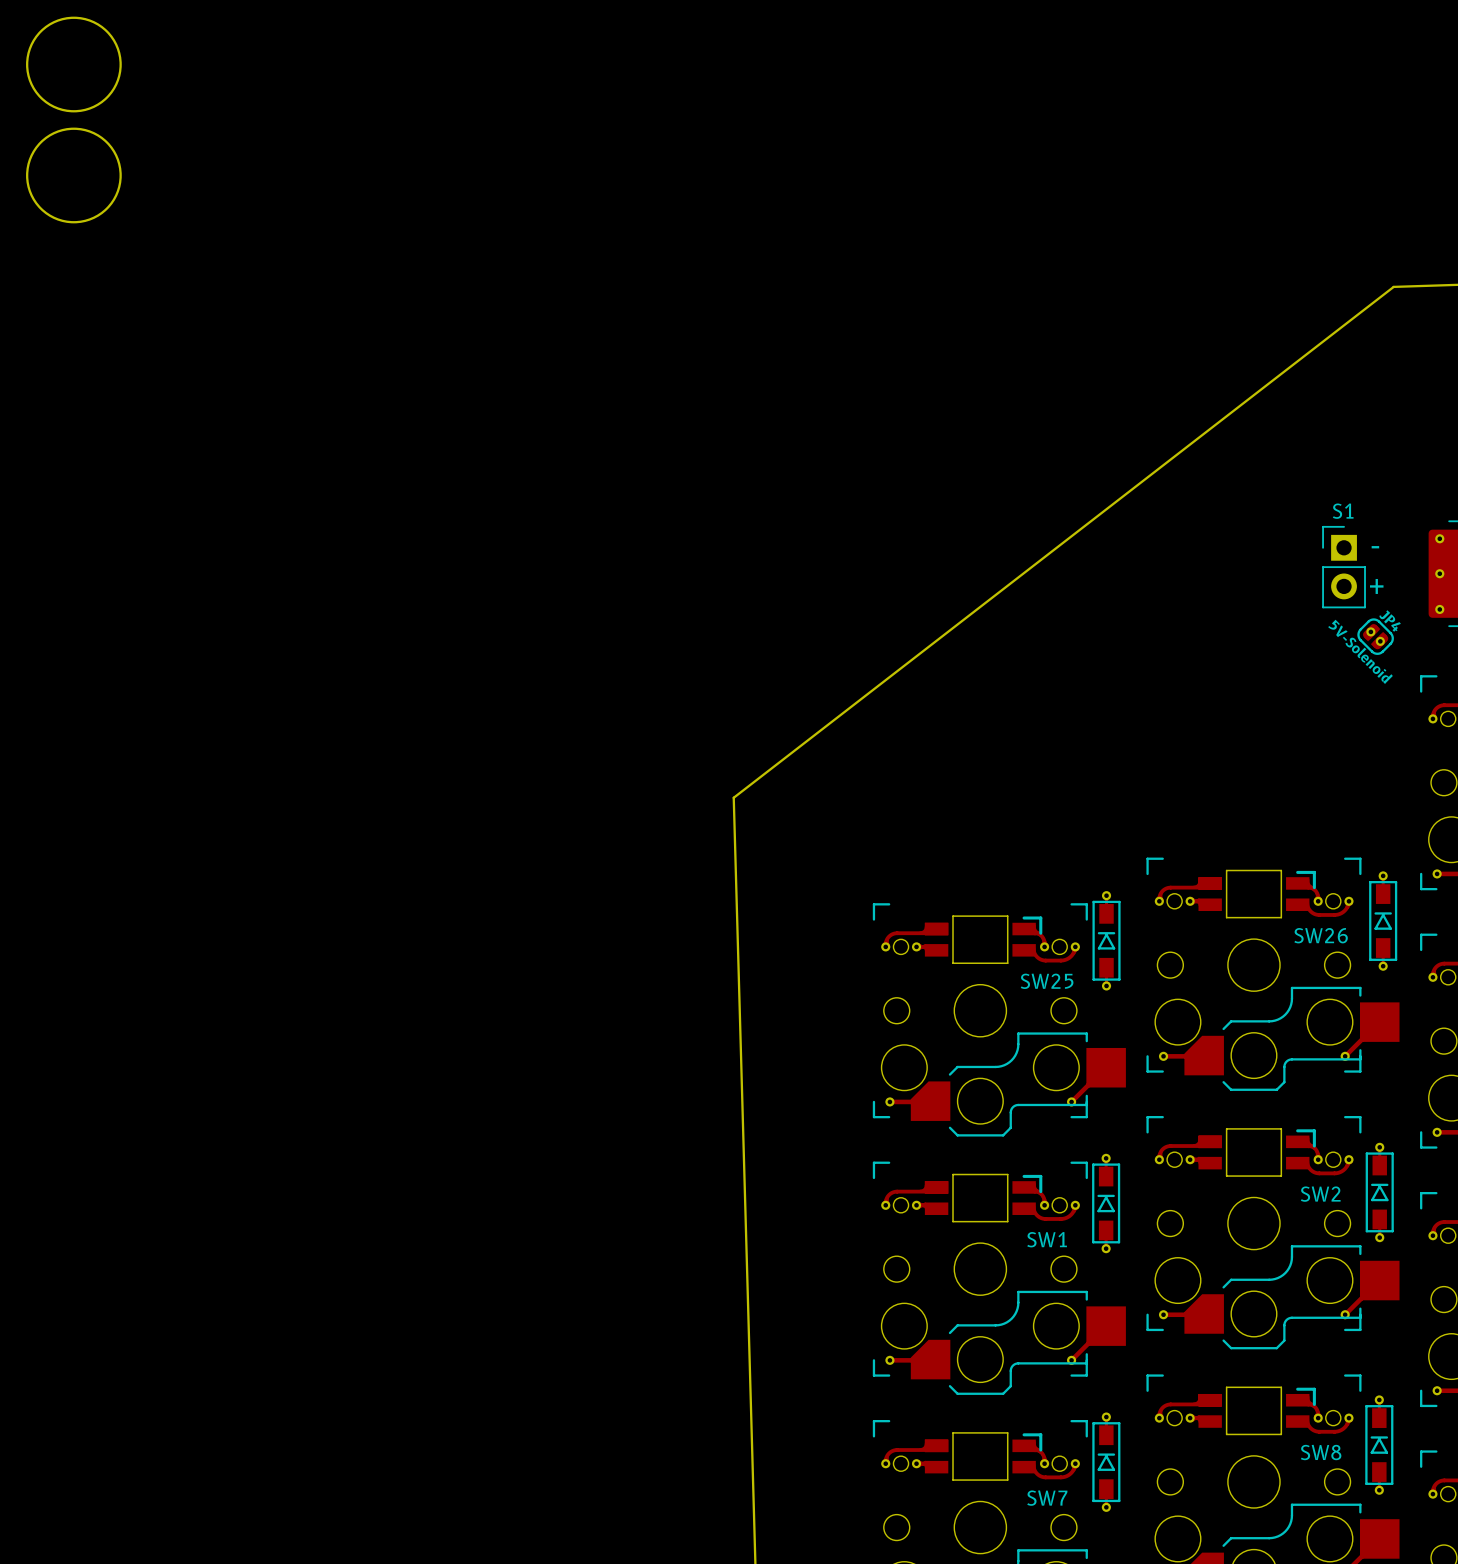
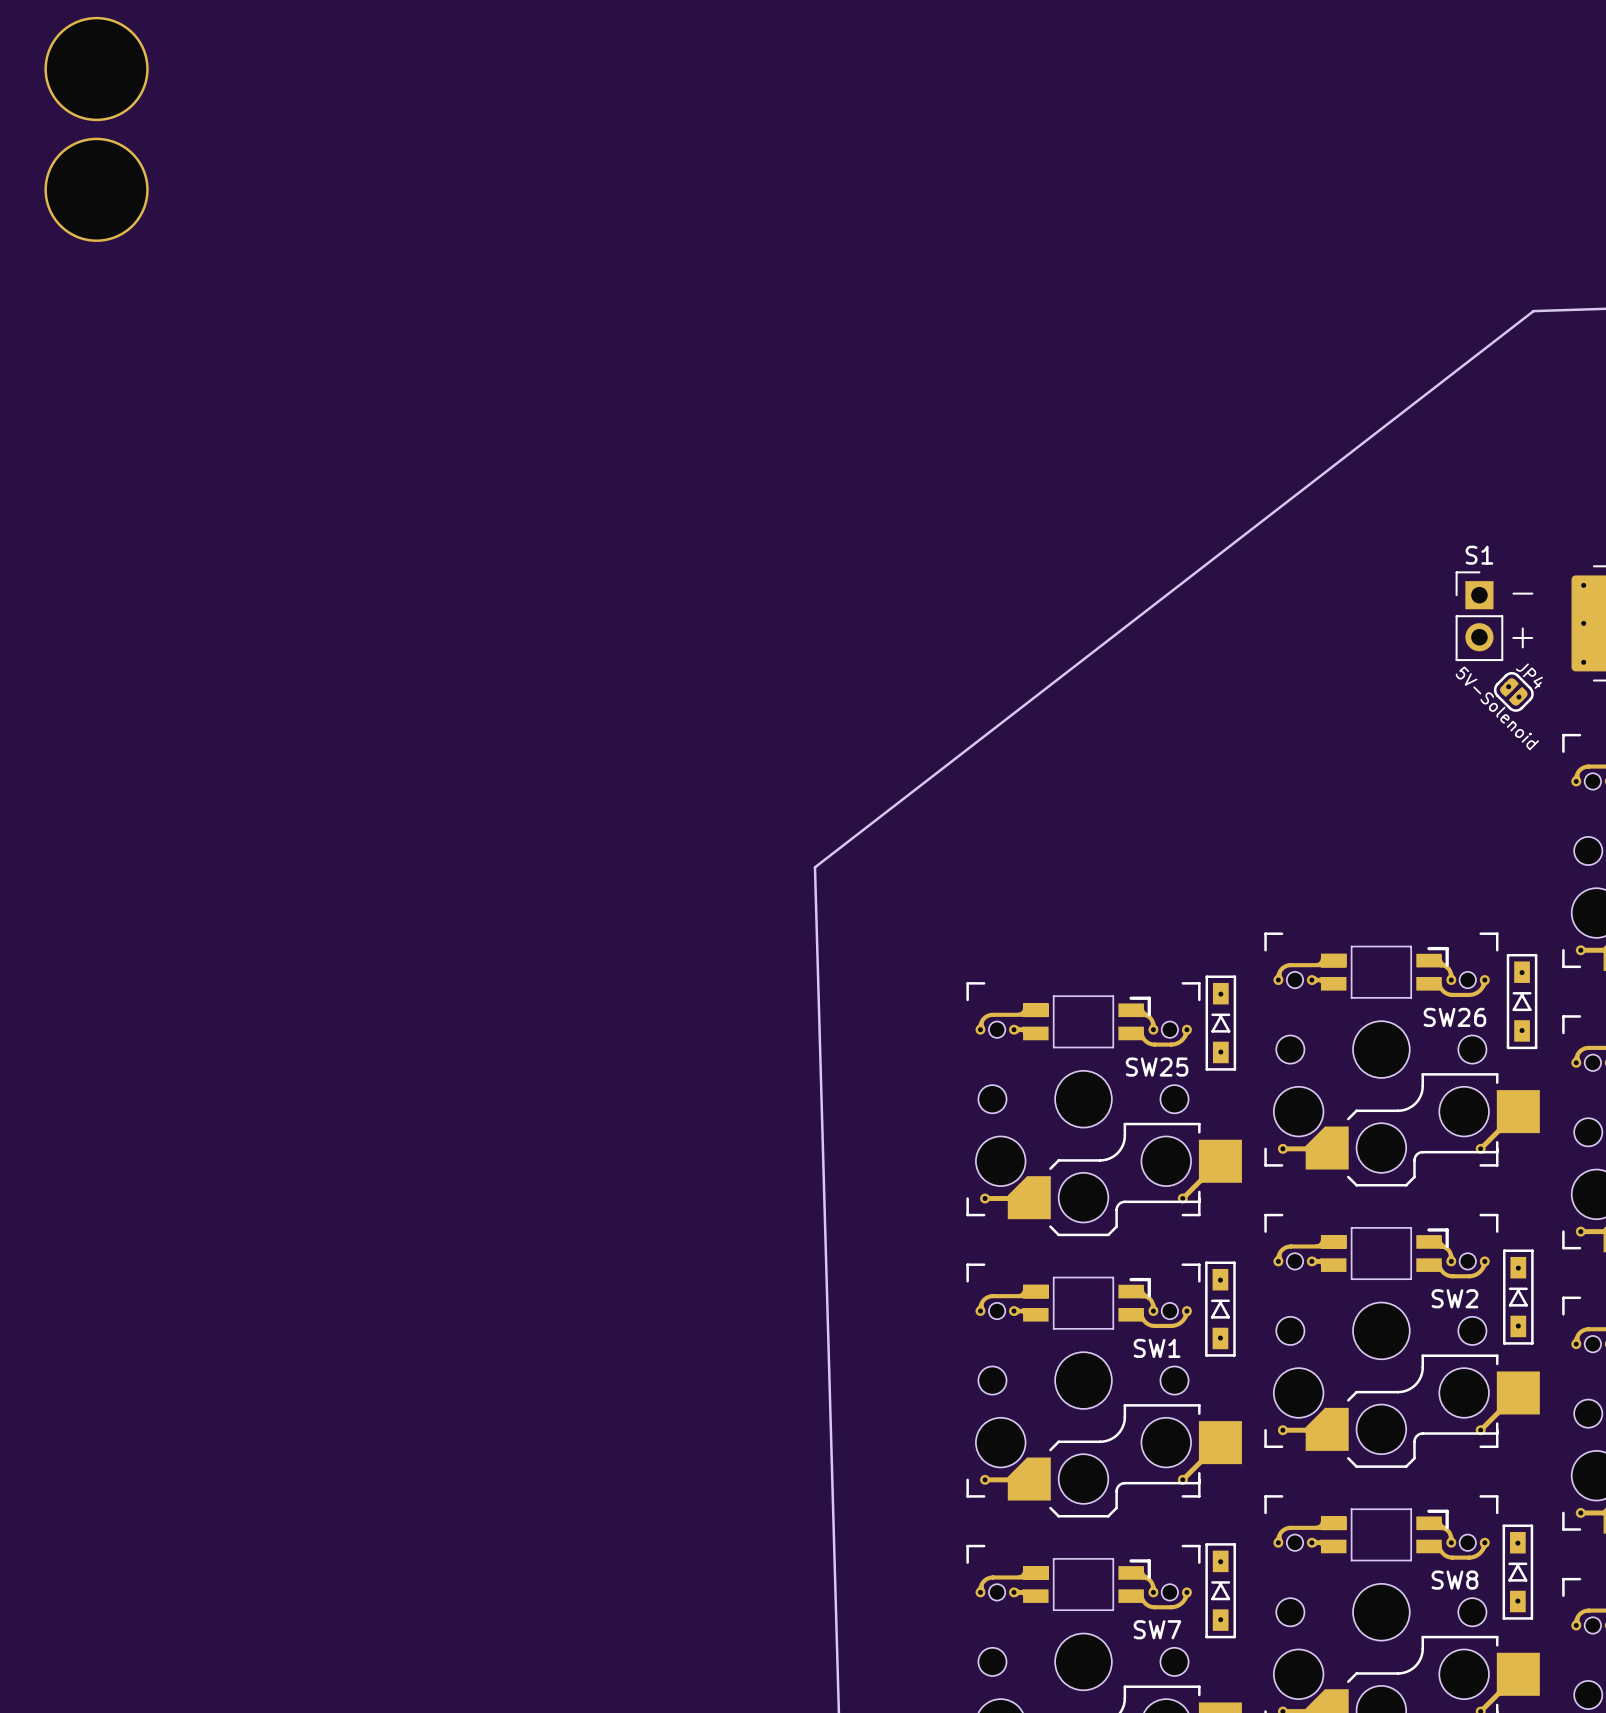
part footprint: [1369, 871, 1398, 971] -> [1506, 953, 1538, 1050]
part footprint: [1092, 891, 1121, 991] -> [1205, 975, 1237, 1071]
part footprint: [1365, 1142, 1394, 1243] -> [1503, 1249, 1534, 1345]
part footprint: [1092, 1153, 1121, 1254] -> [1205, 1261, 1236, 1357]
part footprint: [1365, 1395, 1394, 1495] -> [1502, 1524, 1534, 1620]
part footprint: [1092, 1412, 1121, 1512] -> [1205, 1543, 1236, 1639]

